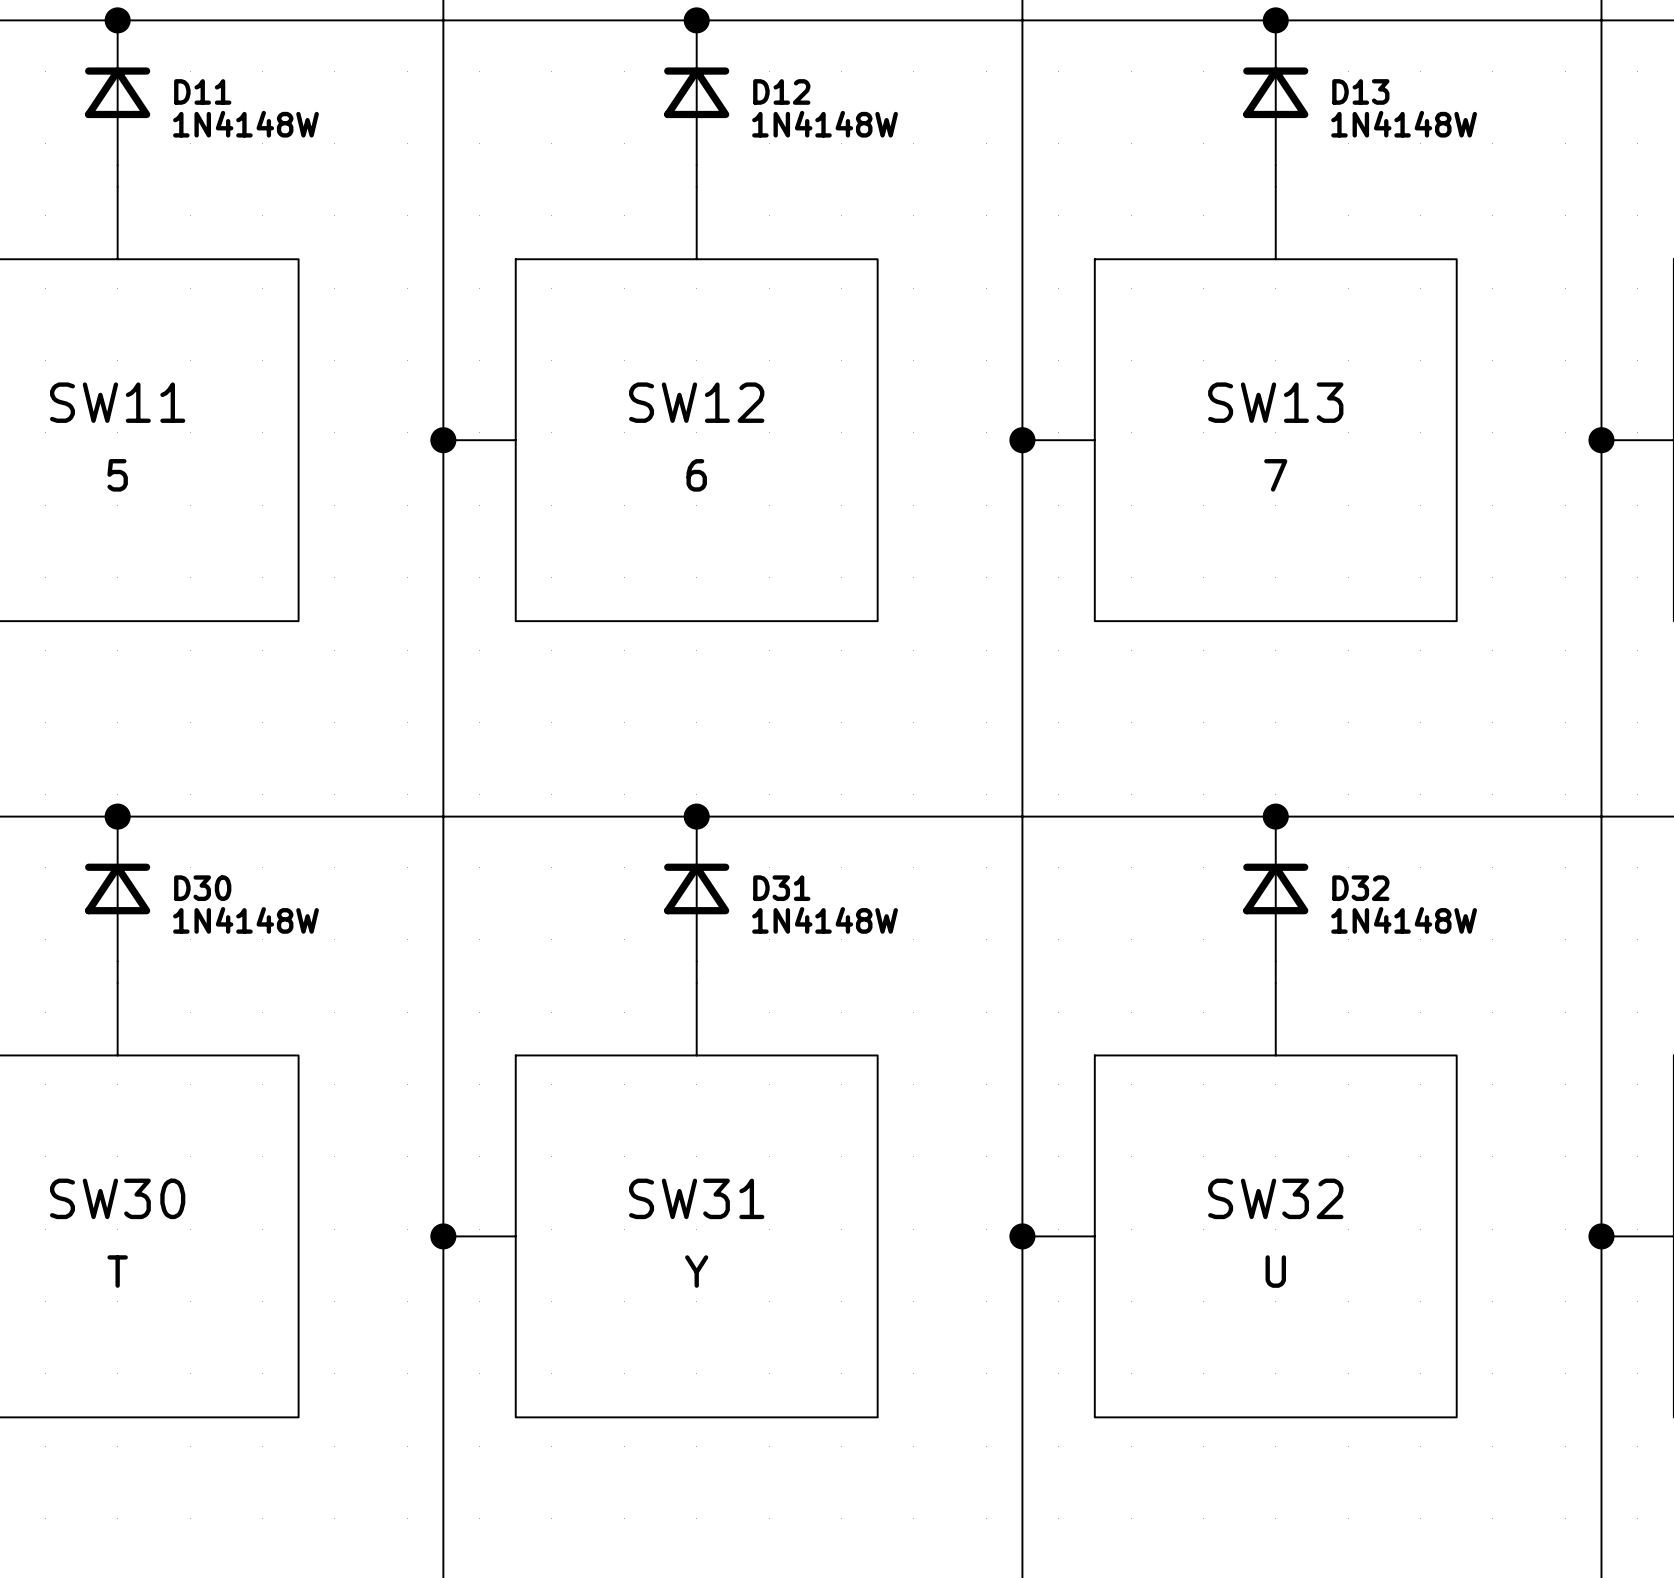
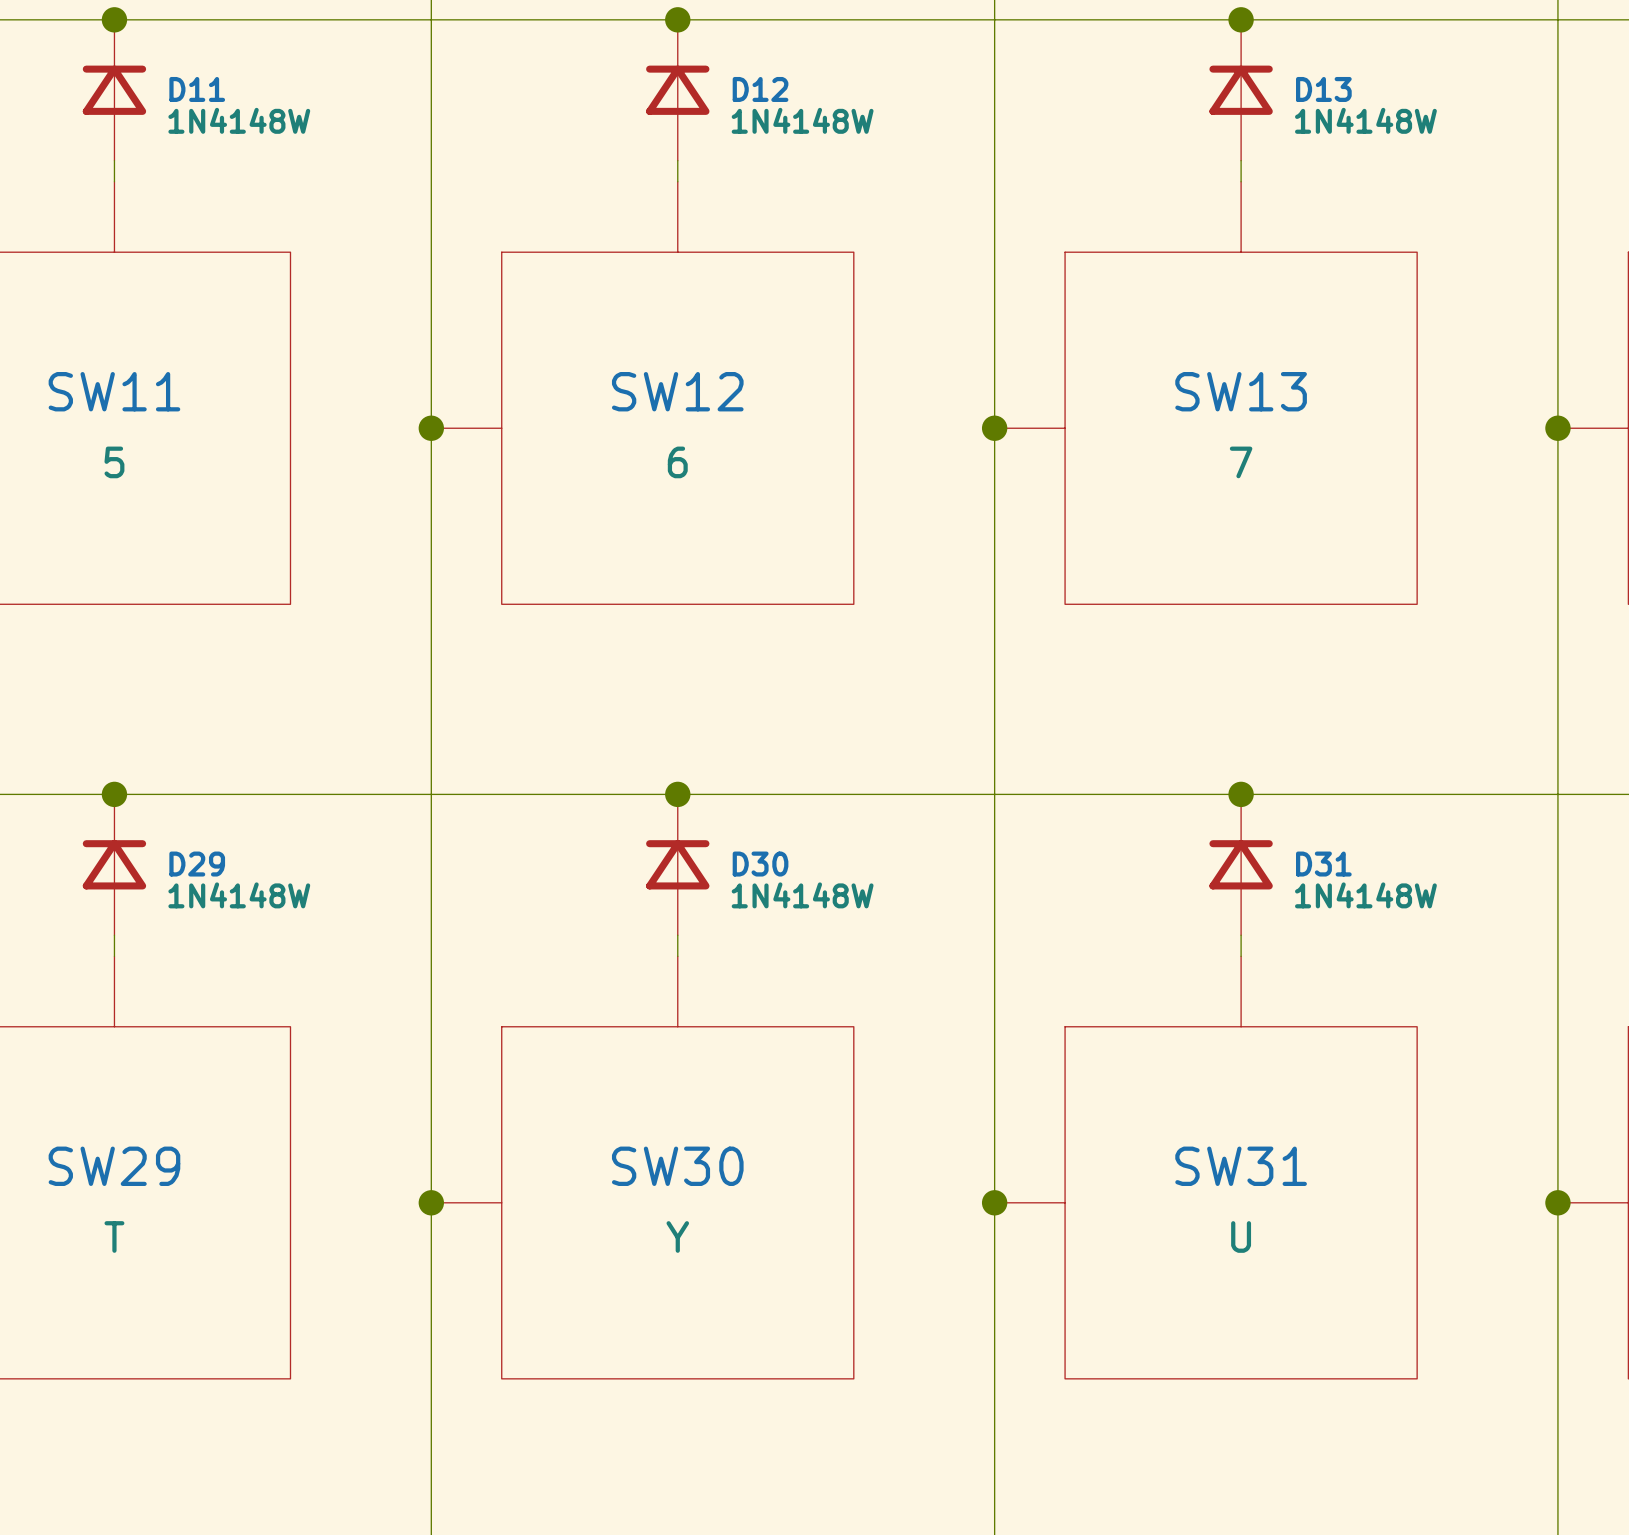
D30 name: D30 (202, 888) -> D29 (197, 864)
D31 name: D31 (781, 888) -> D30 (760, 864)
D32 name: D32 (1360, 888) -> D31 (1323, 864)
SW30 name: SW30 (117, 1198) -> SW29 (114, 1166)
SW31 name: SW31 (696, 1198) -> SW30 (677, 1166)
SW32 name: SW32 (1275, 1198) -> SW31 (1241, 1166)

